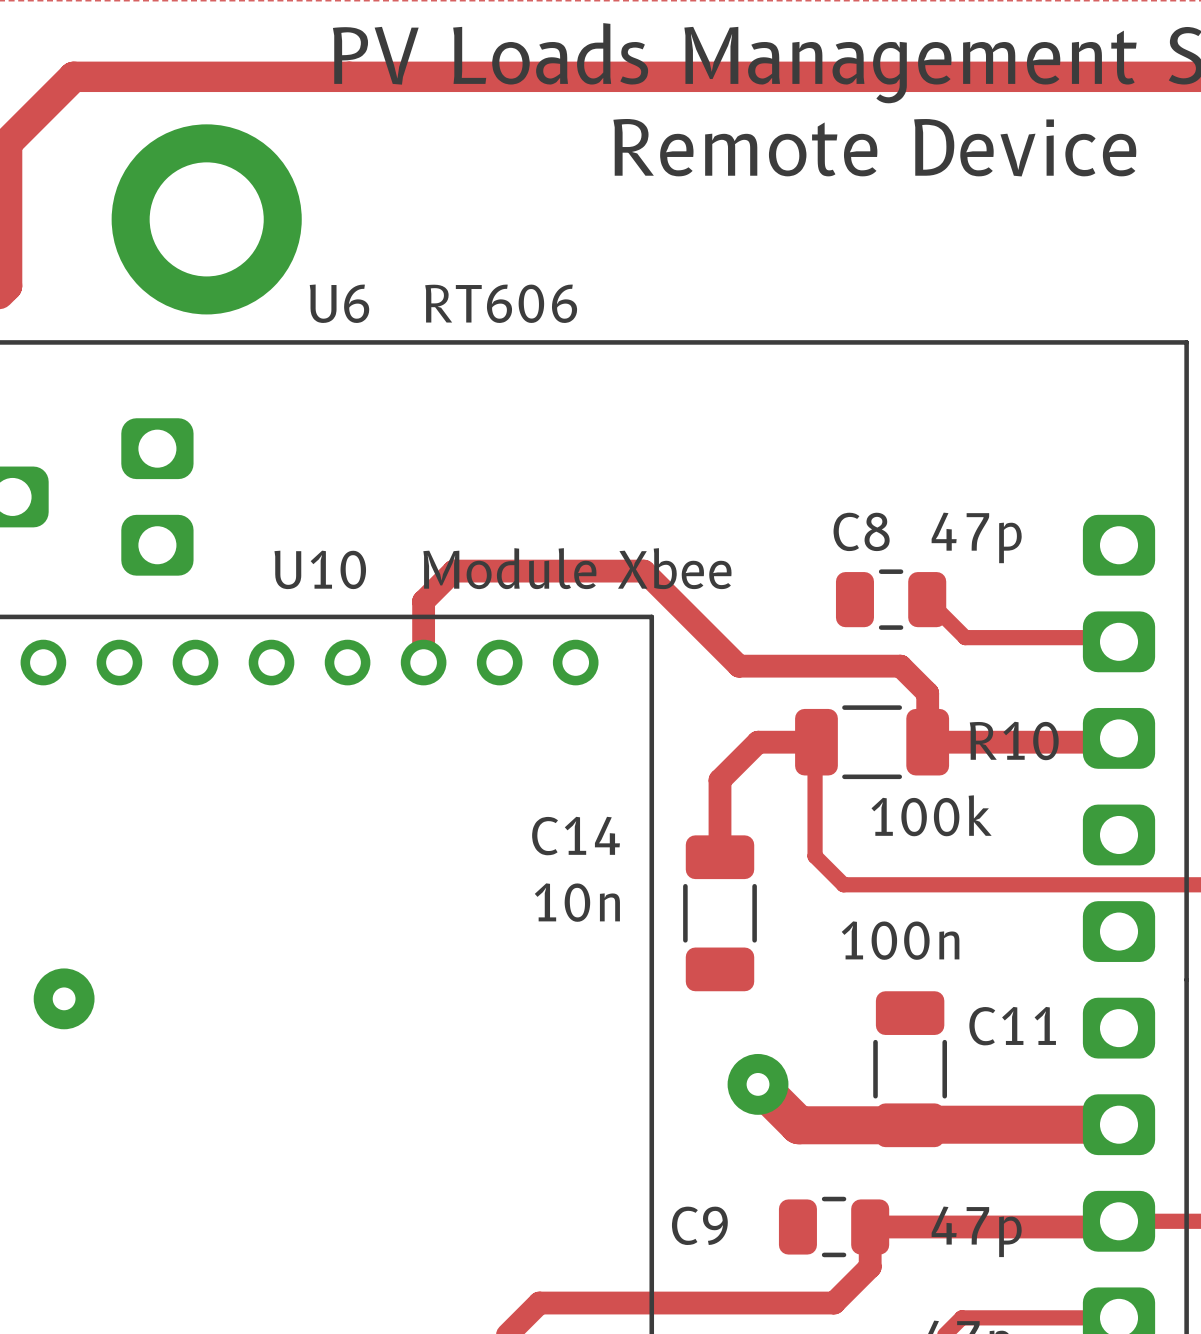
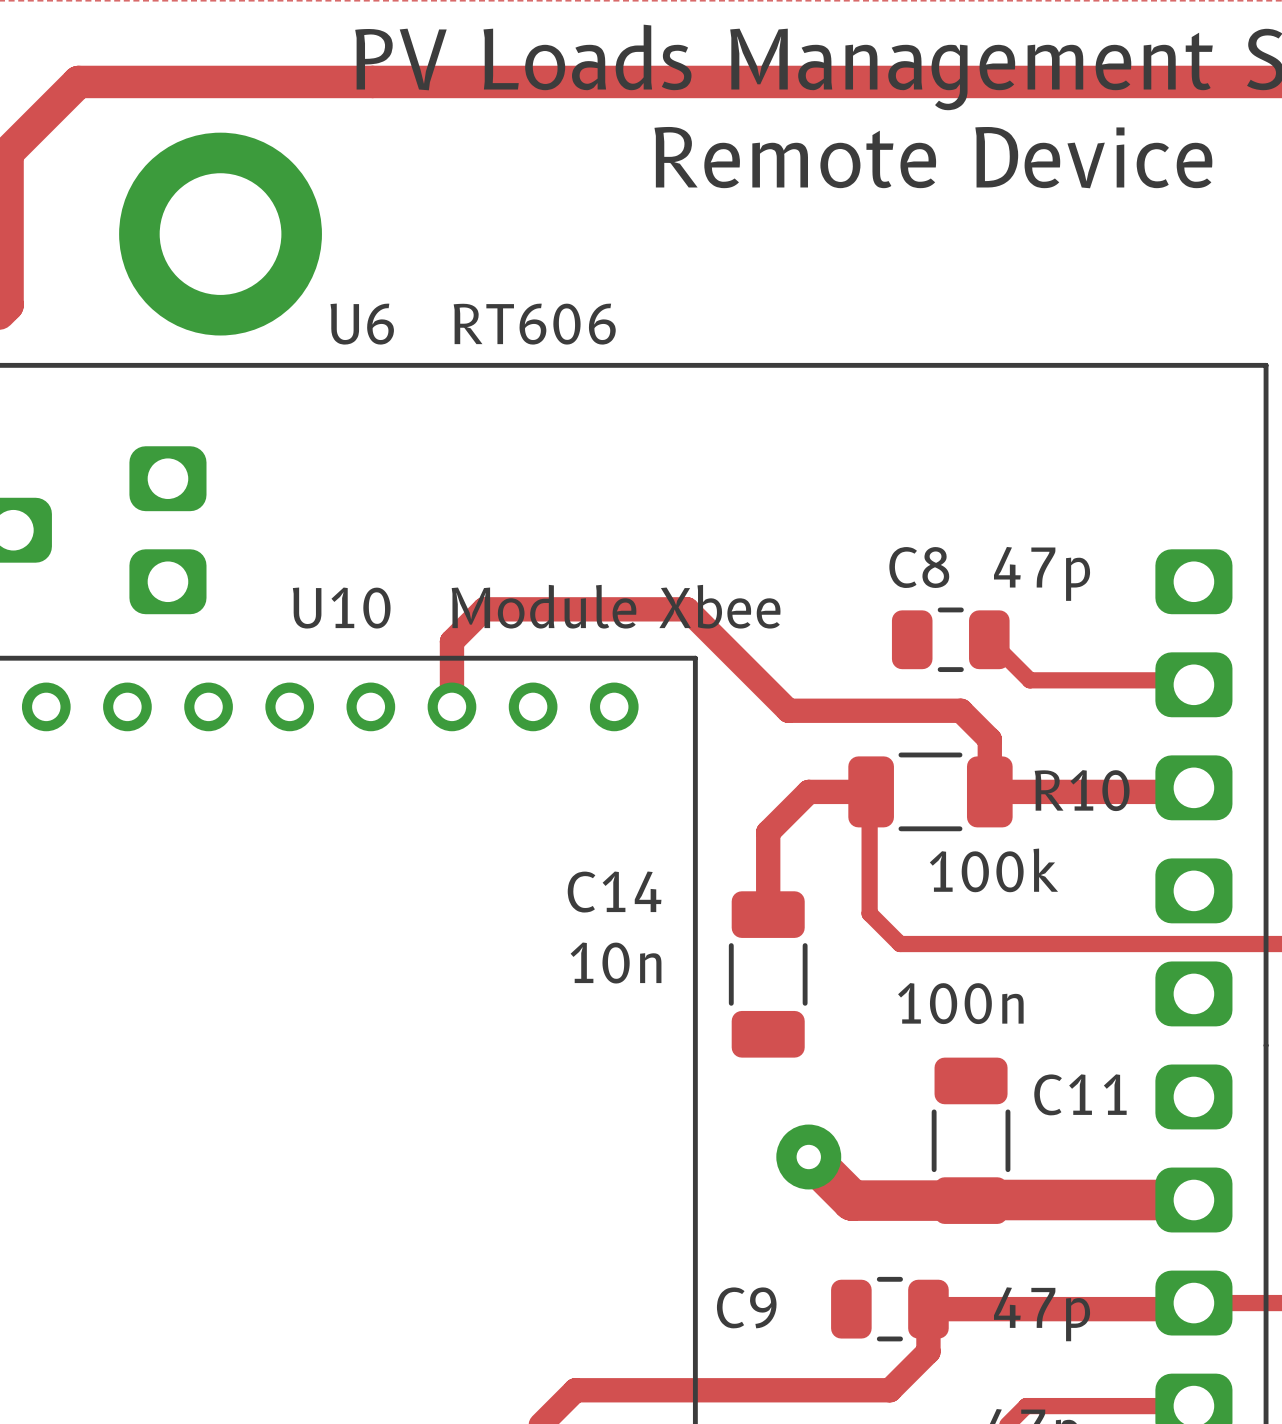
via: (64, 998) -> none

